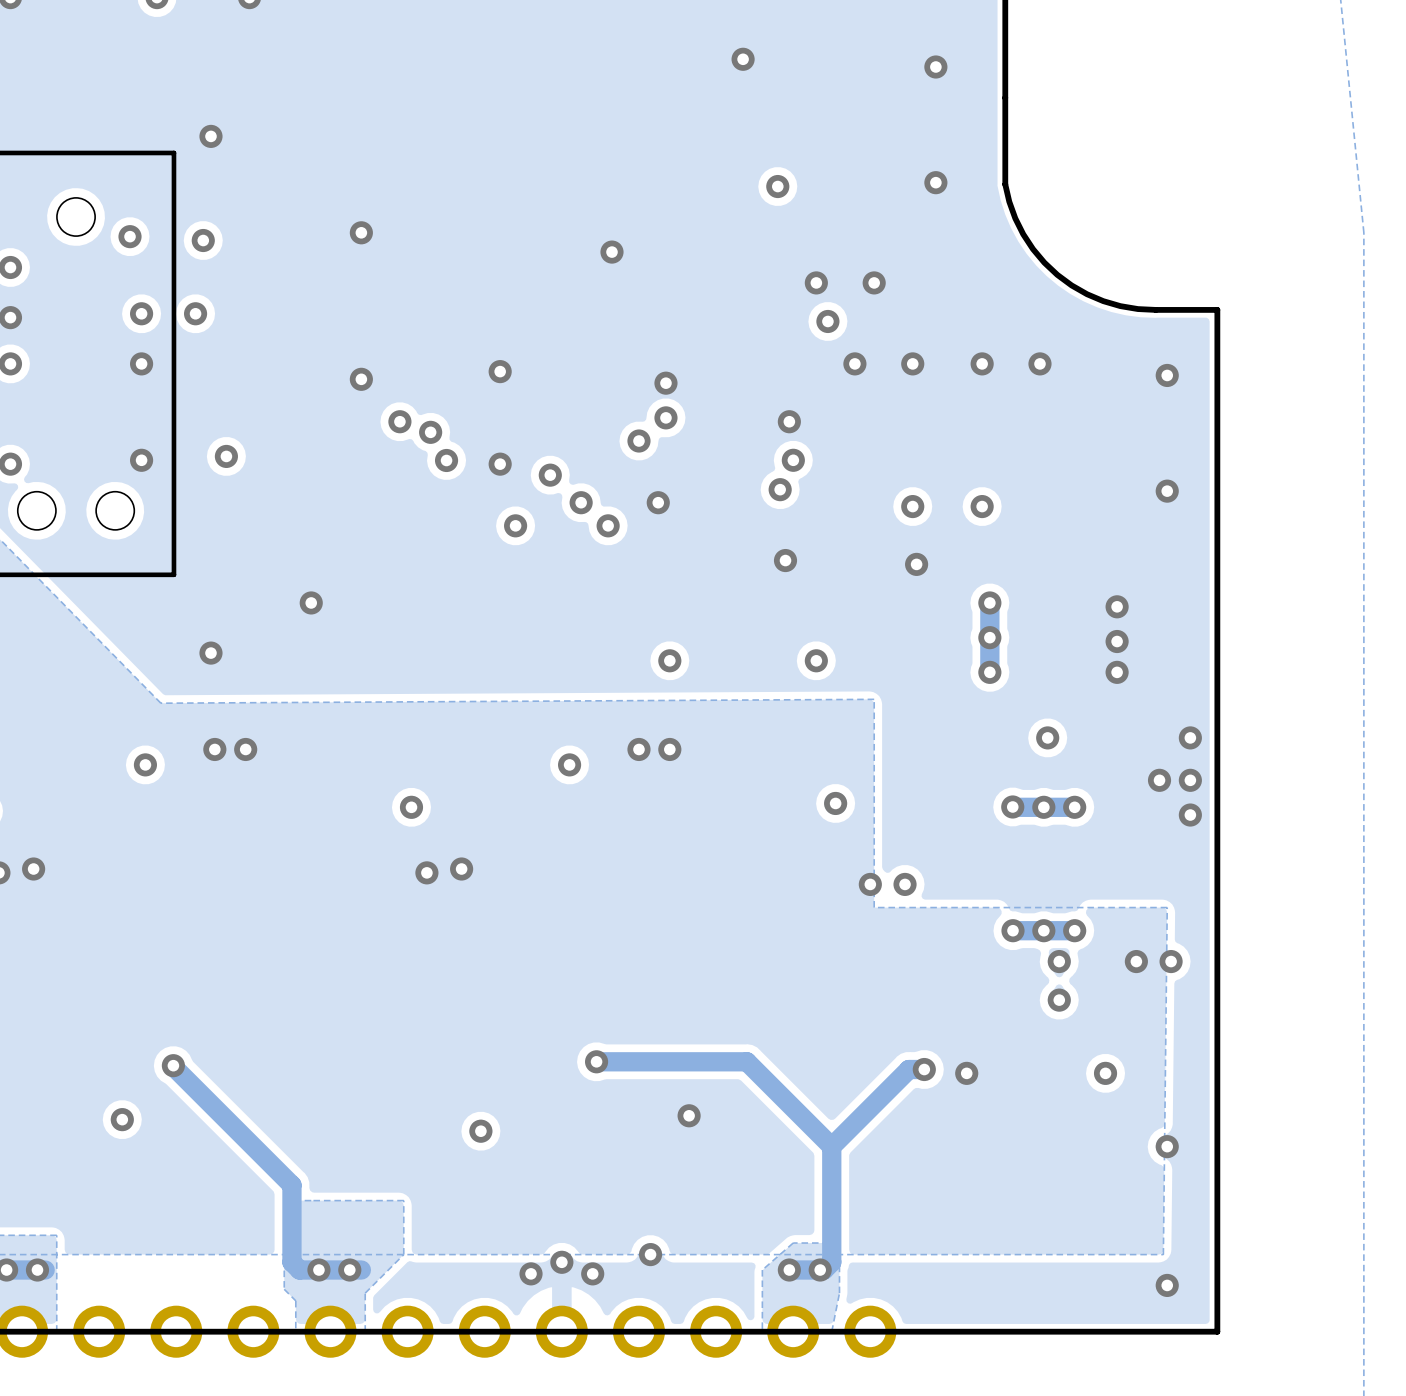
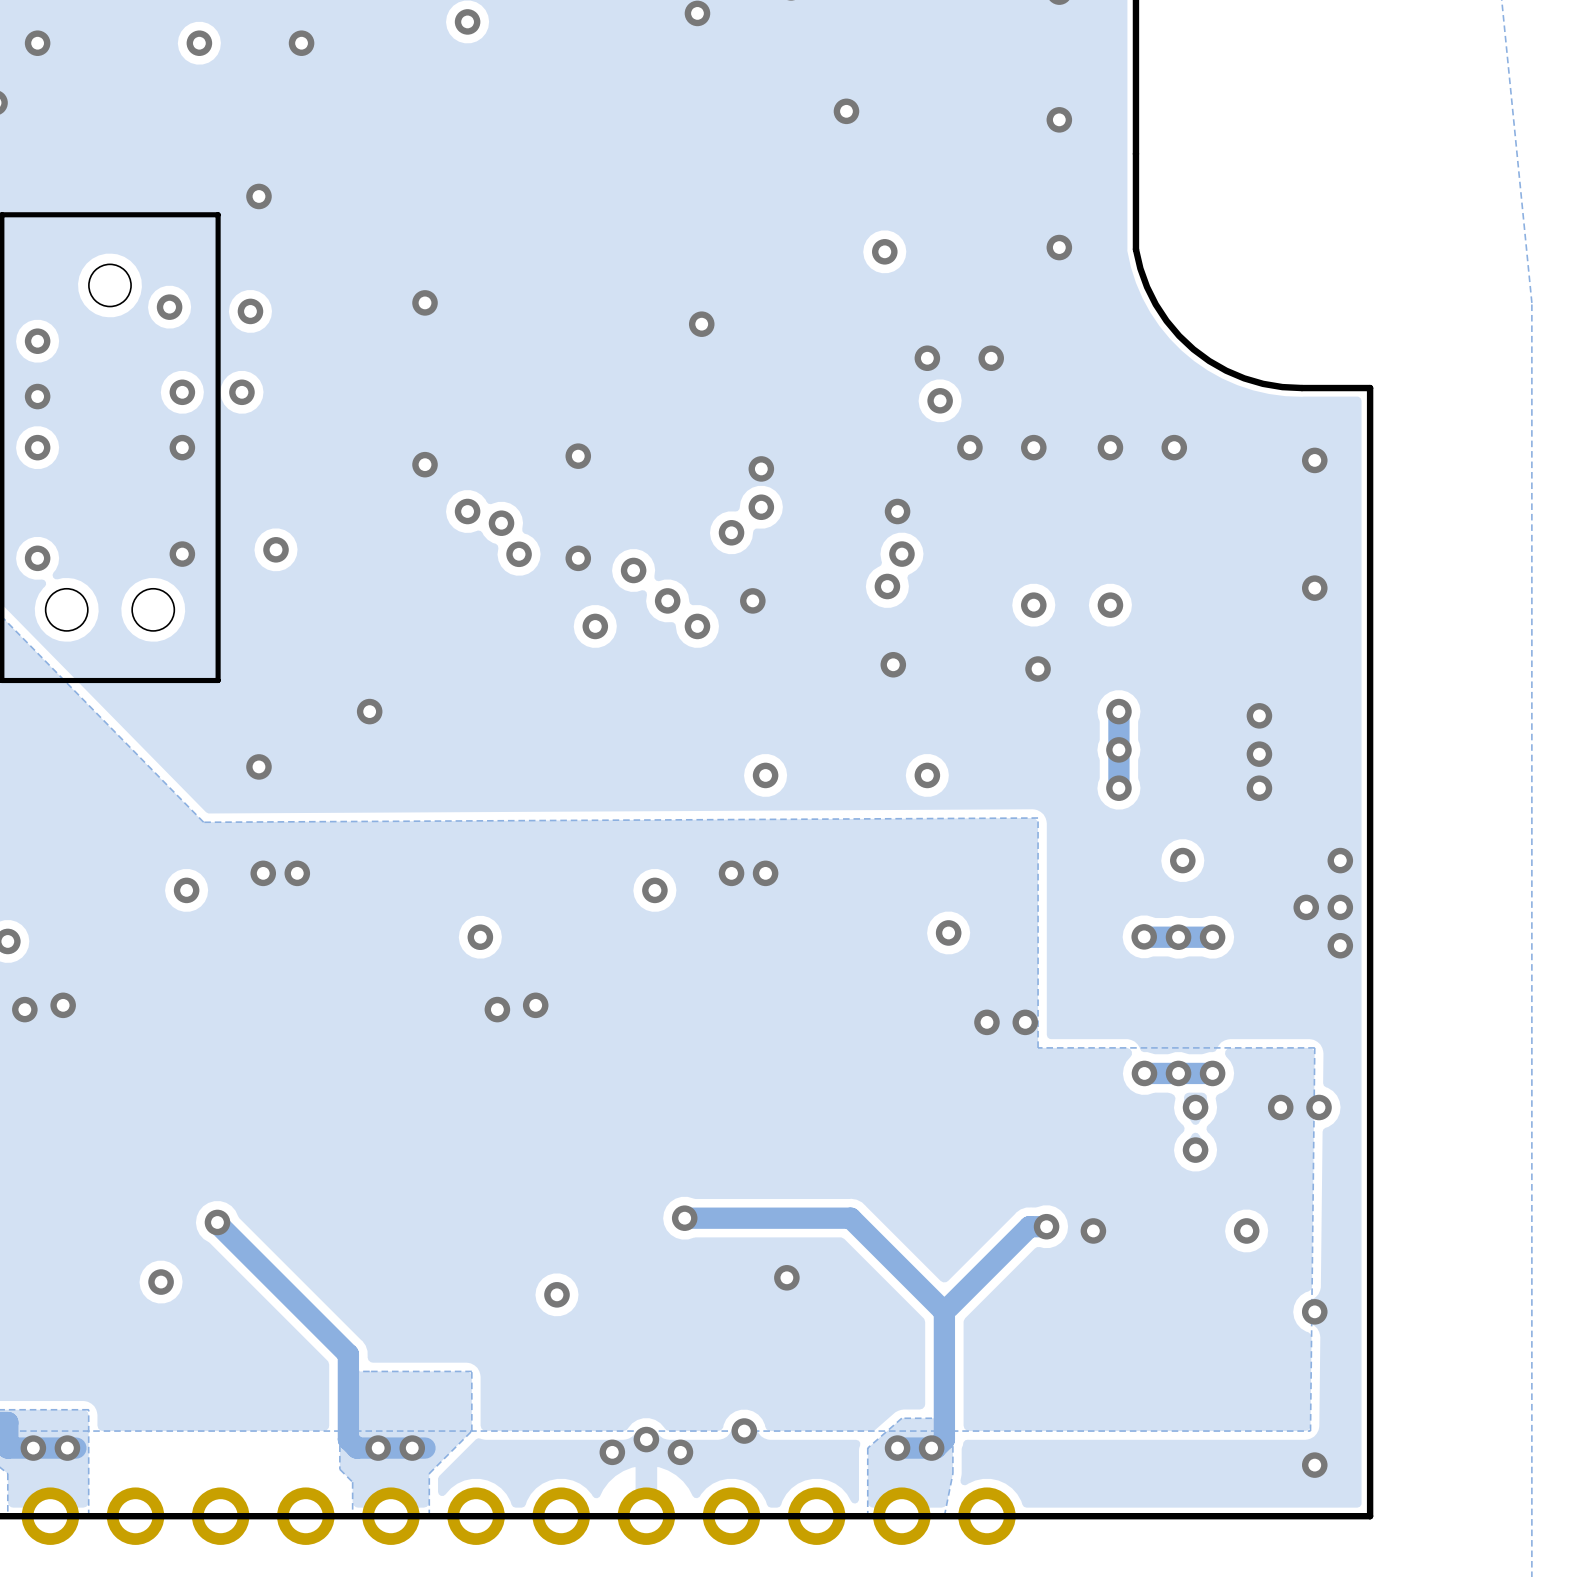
zone outline: (160, 703) (874, 699) (874, 907) (916, 907) -> (203, 822) (1038, 818) (1038, 1047)

